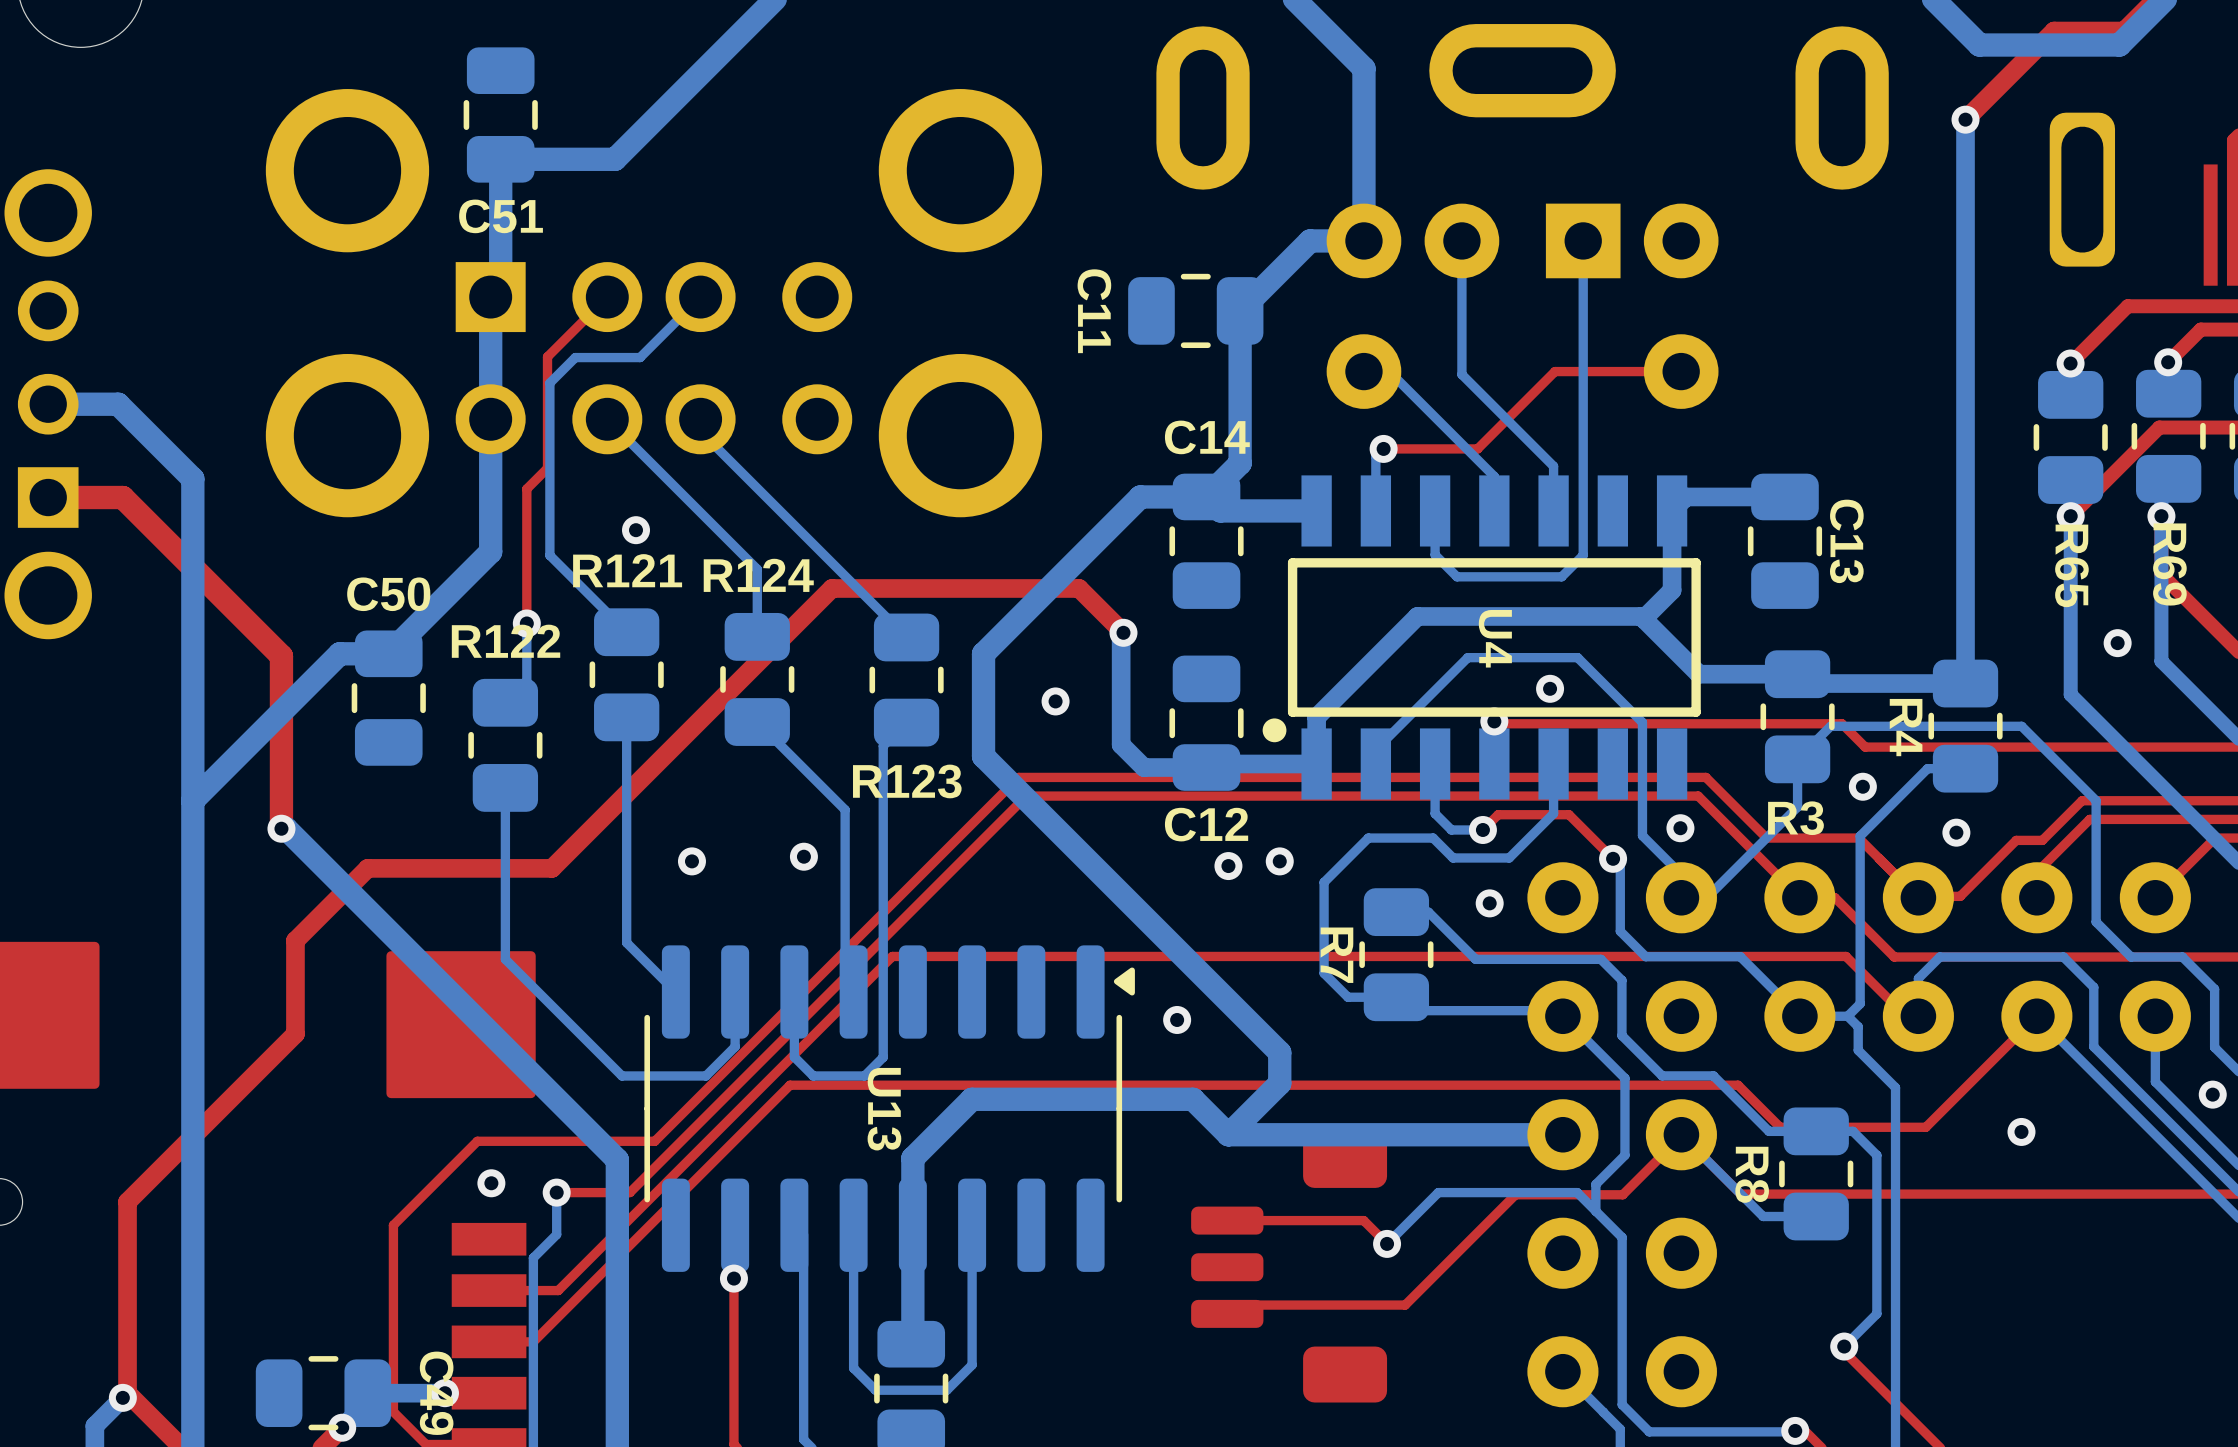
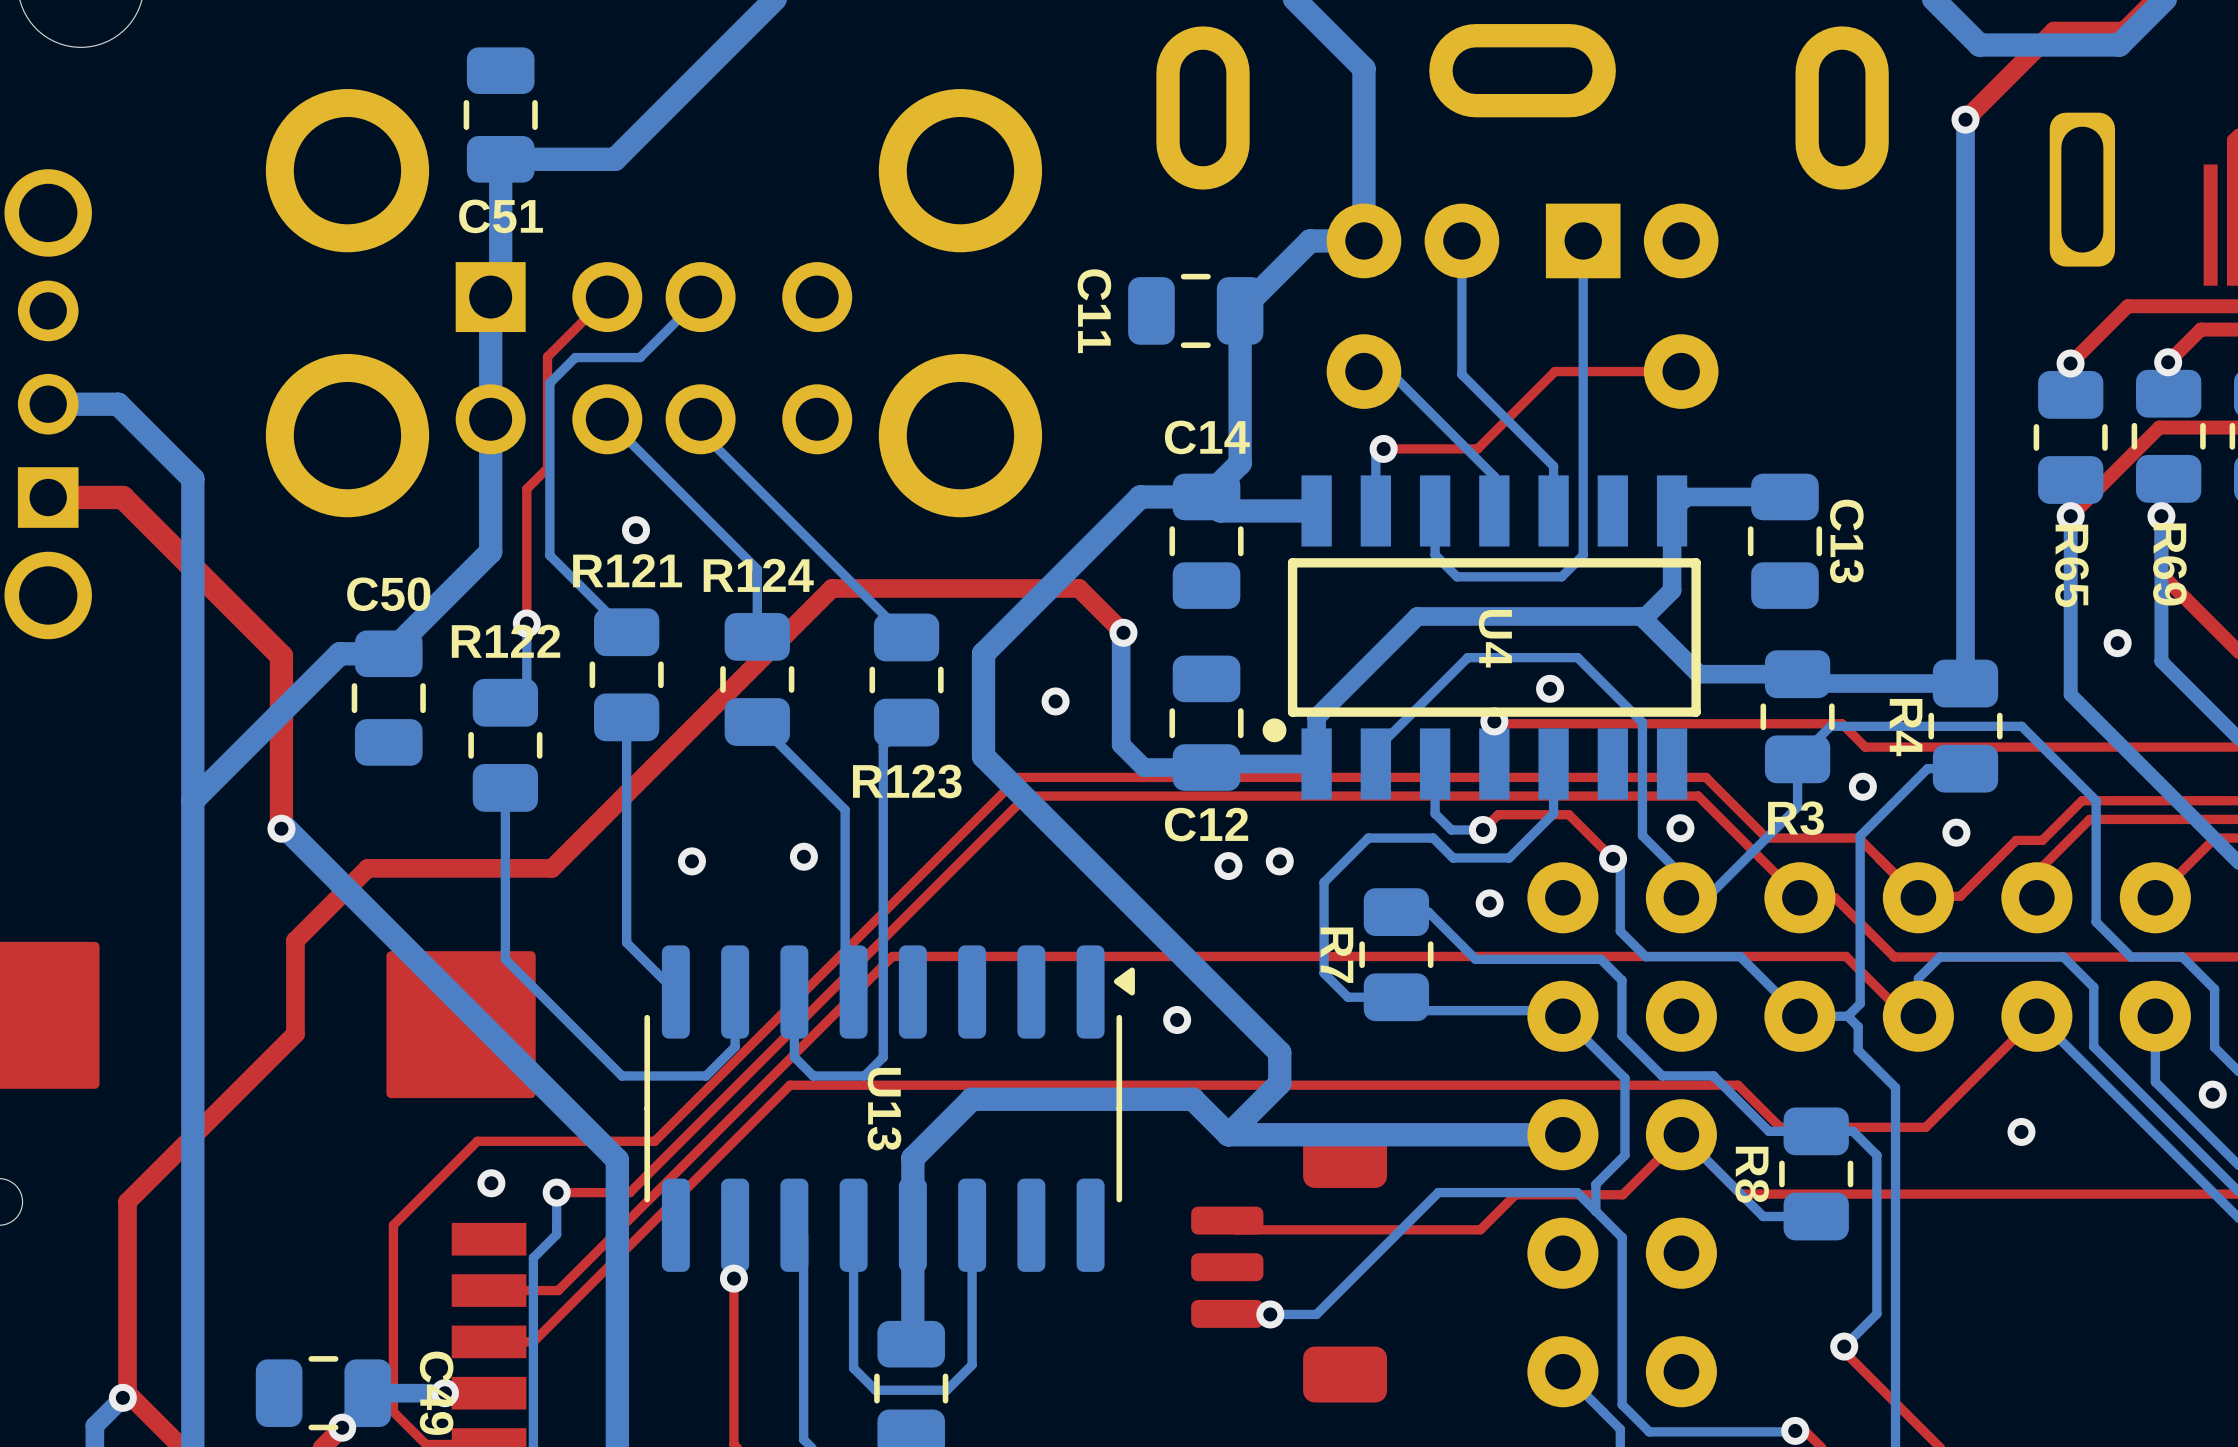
top track: (1227, 1220) (1363, 1220) (1387, 1243) -> none
top track: (1480, 1229) (1405, 1305) (1236, 1305) -> (1480, 1229) (1236, 1229) (1227, 1220)
bottom track: none -> (1387, 1243) (1316, 1314) (1270, 1314)
via position: (1387, 1243) -> (1270, 1314)

